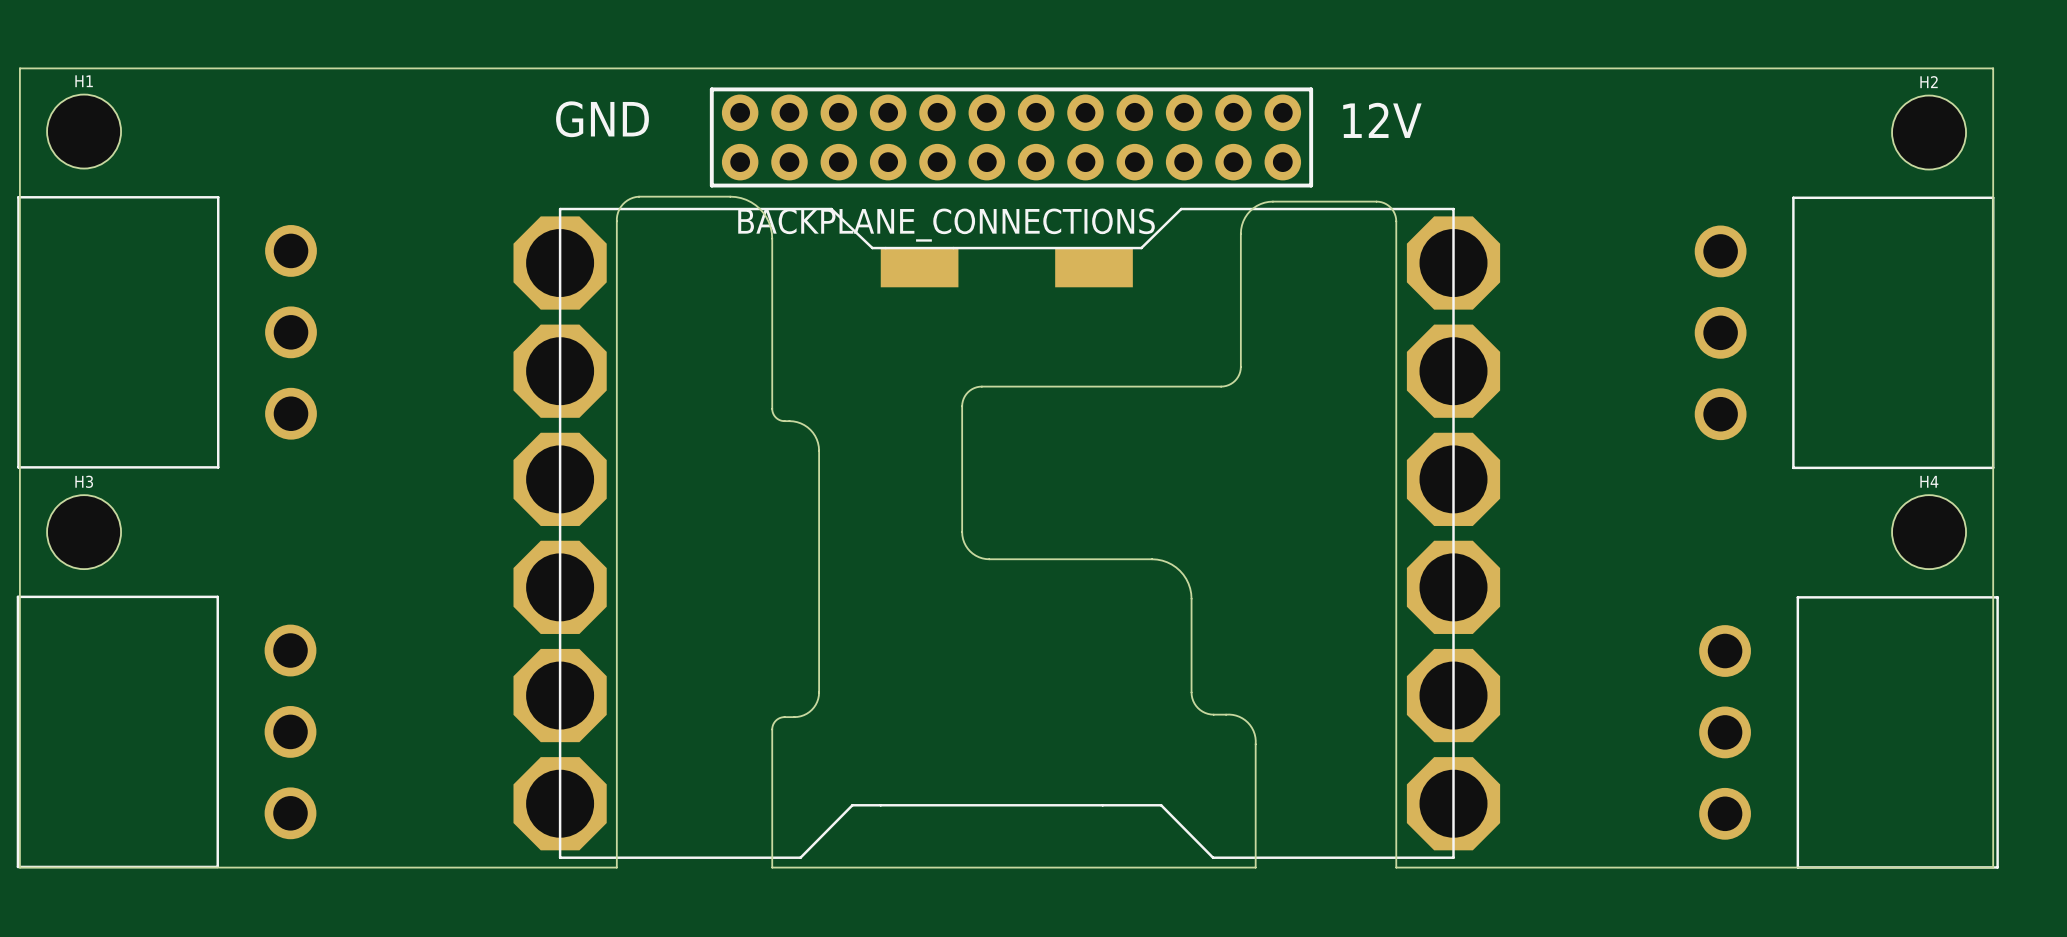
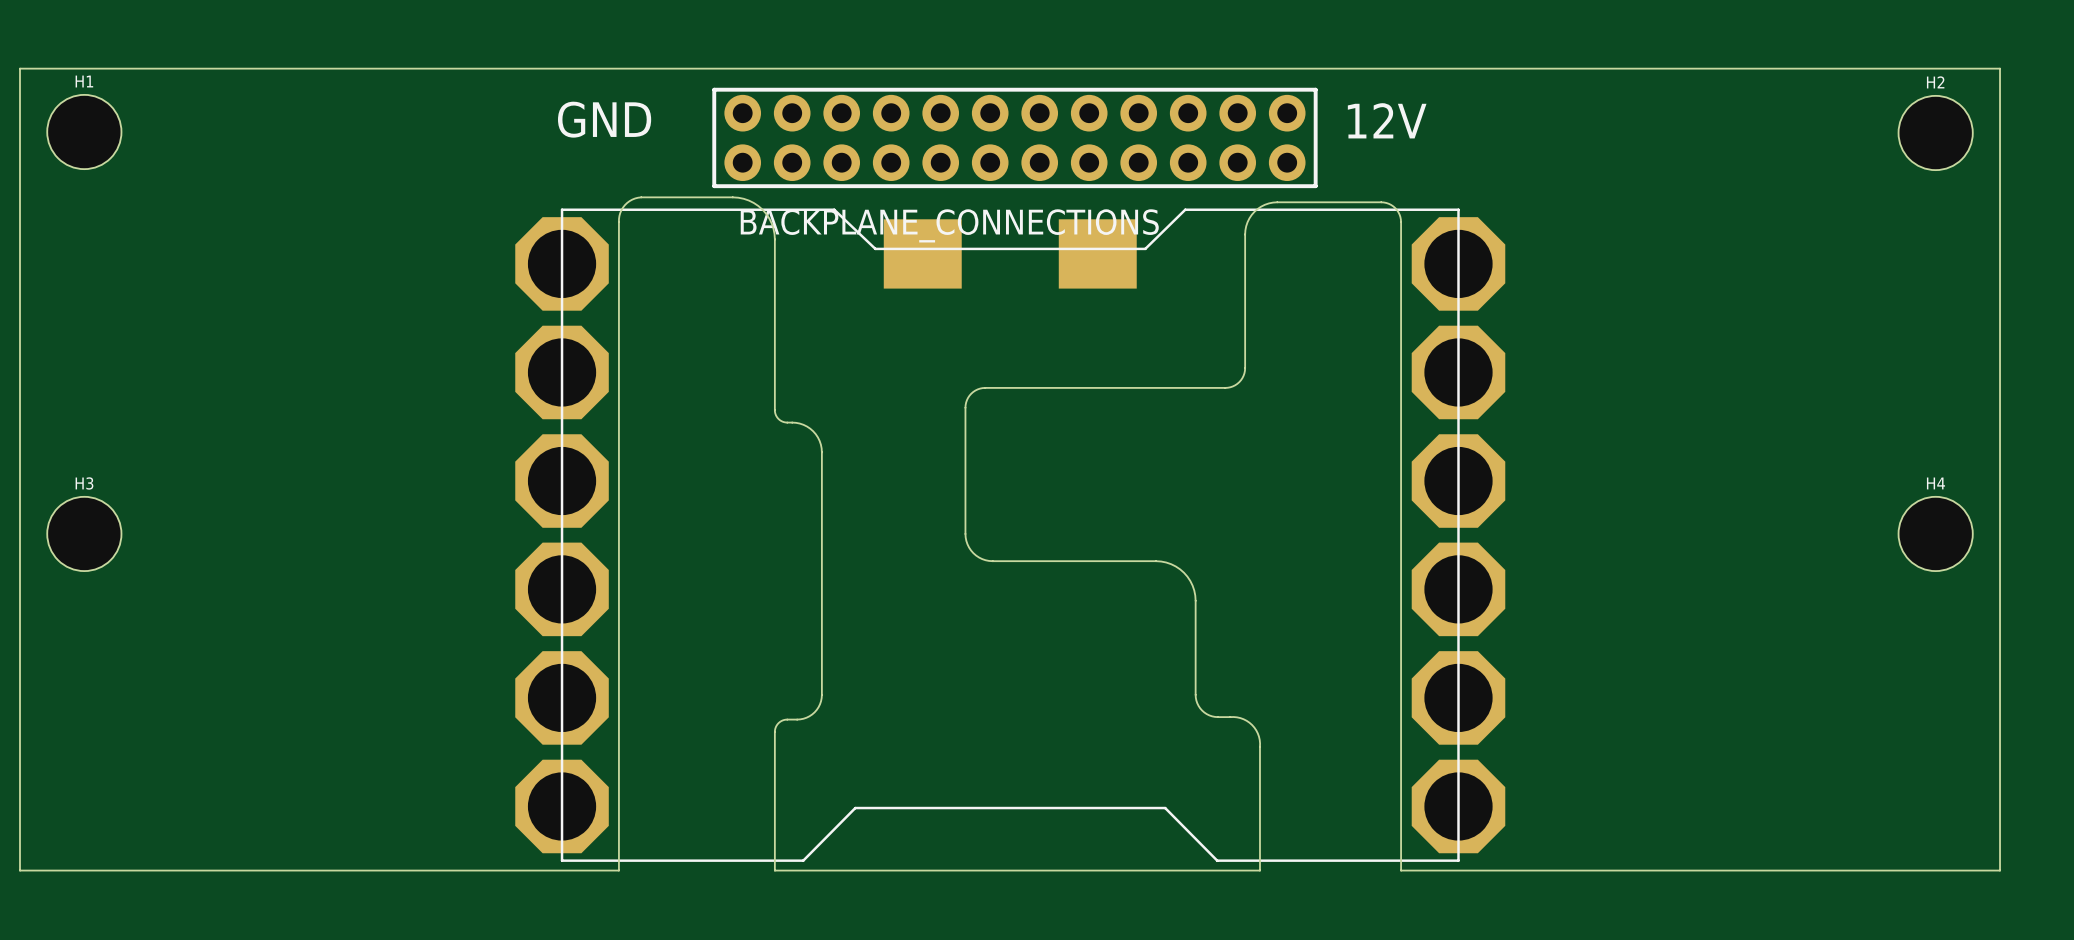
part footprint: [513, 207, 1501, 859] -> [515, 208, 1506, 862]
part: (167, 332) -> none
part: (1844, 332) -> none
part: (166, 731) -> none
part: (1849, 732) -> none

